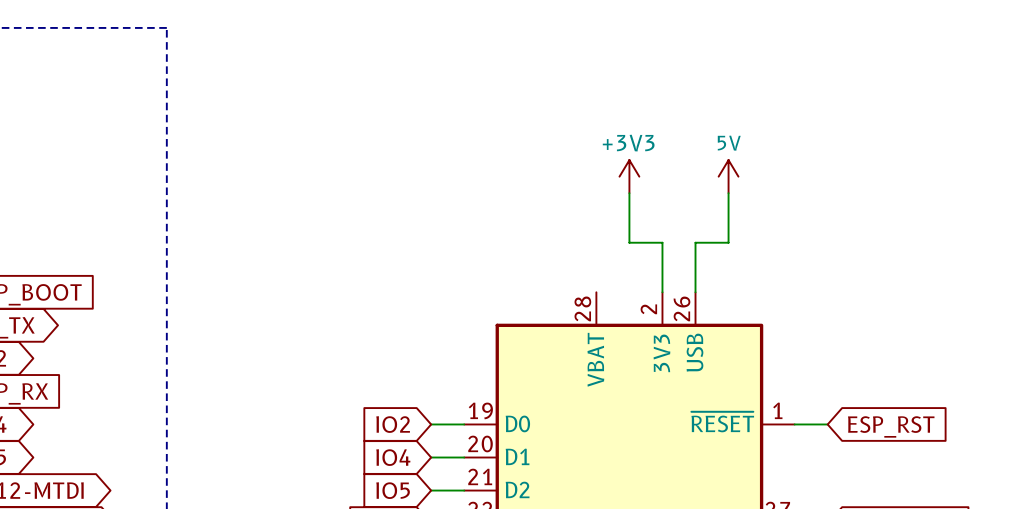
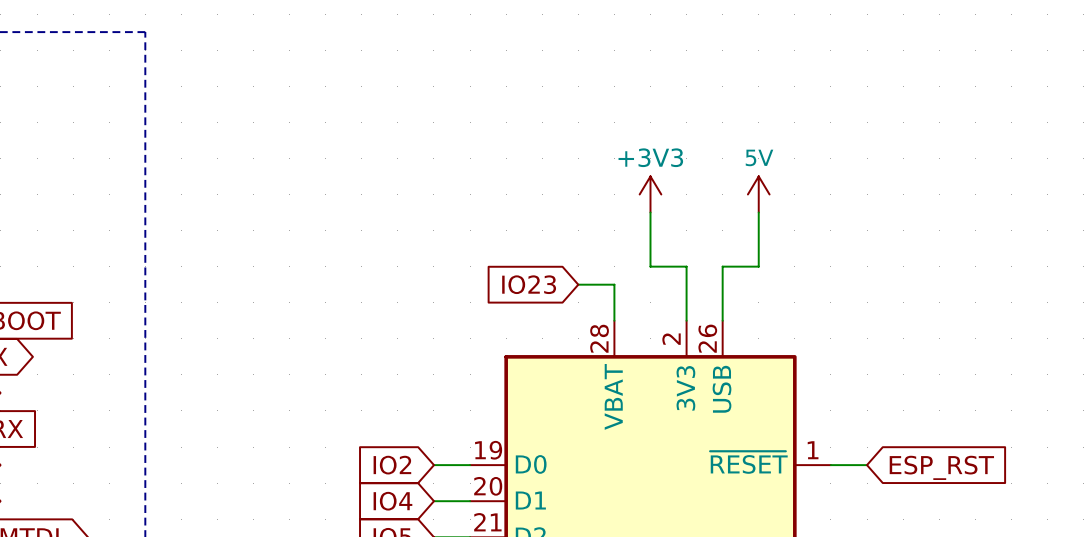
global label: none -> IO23 (529, 284)
wire: none -> (578, 284) (614, 284) (614, 320)

